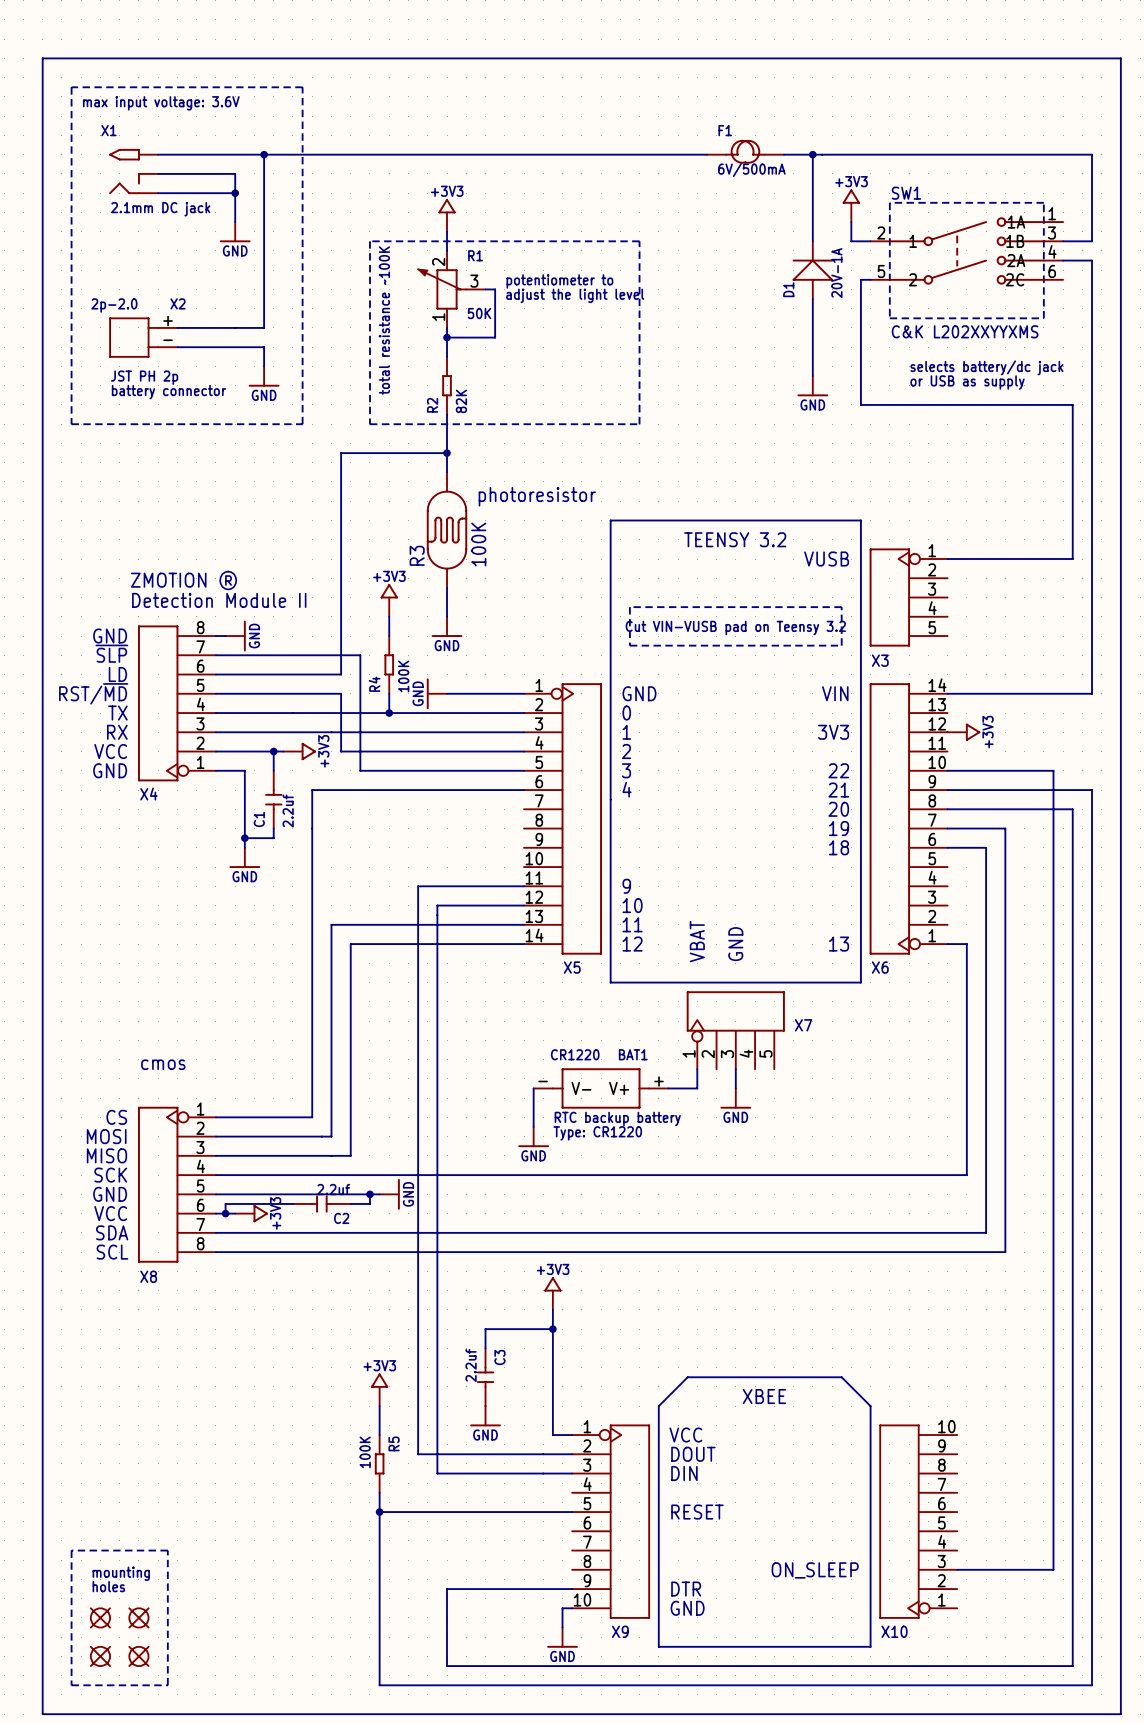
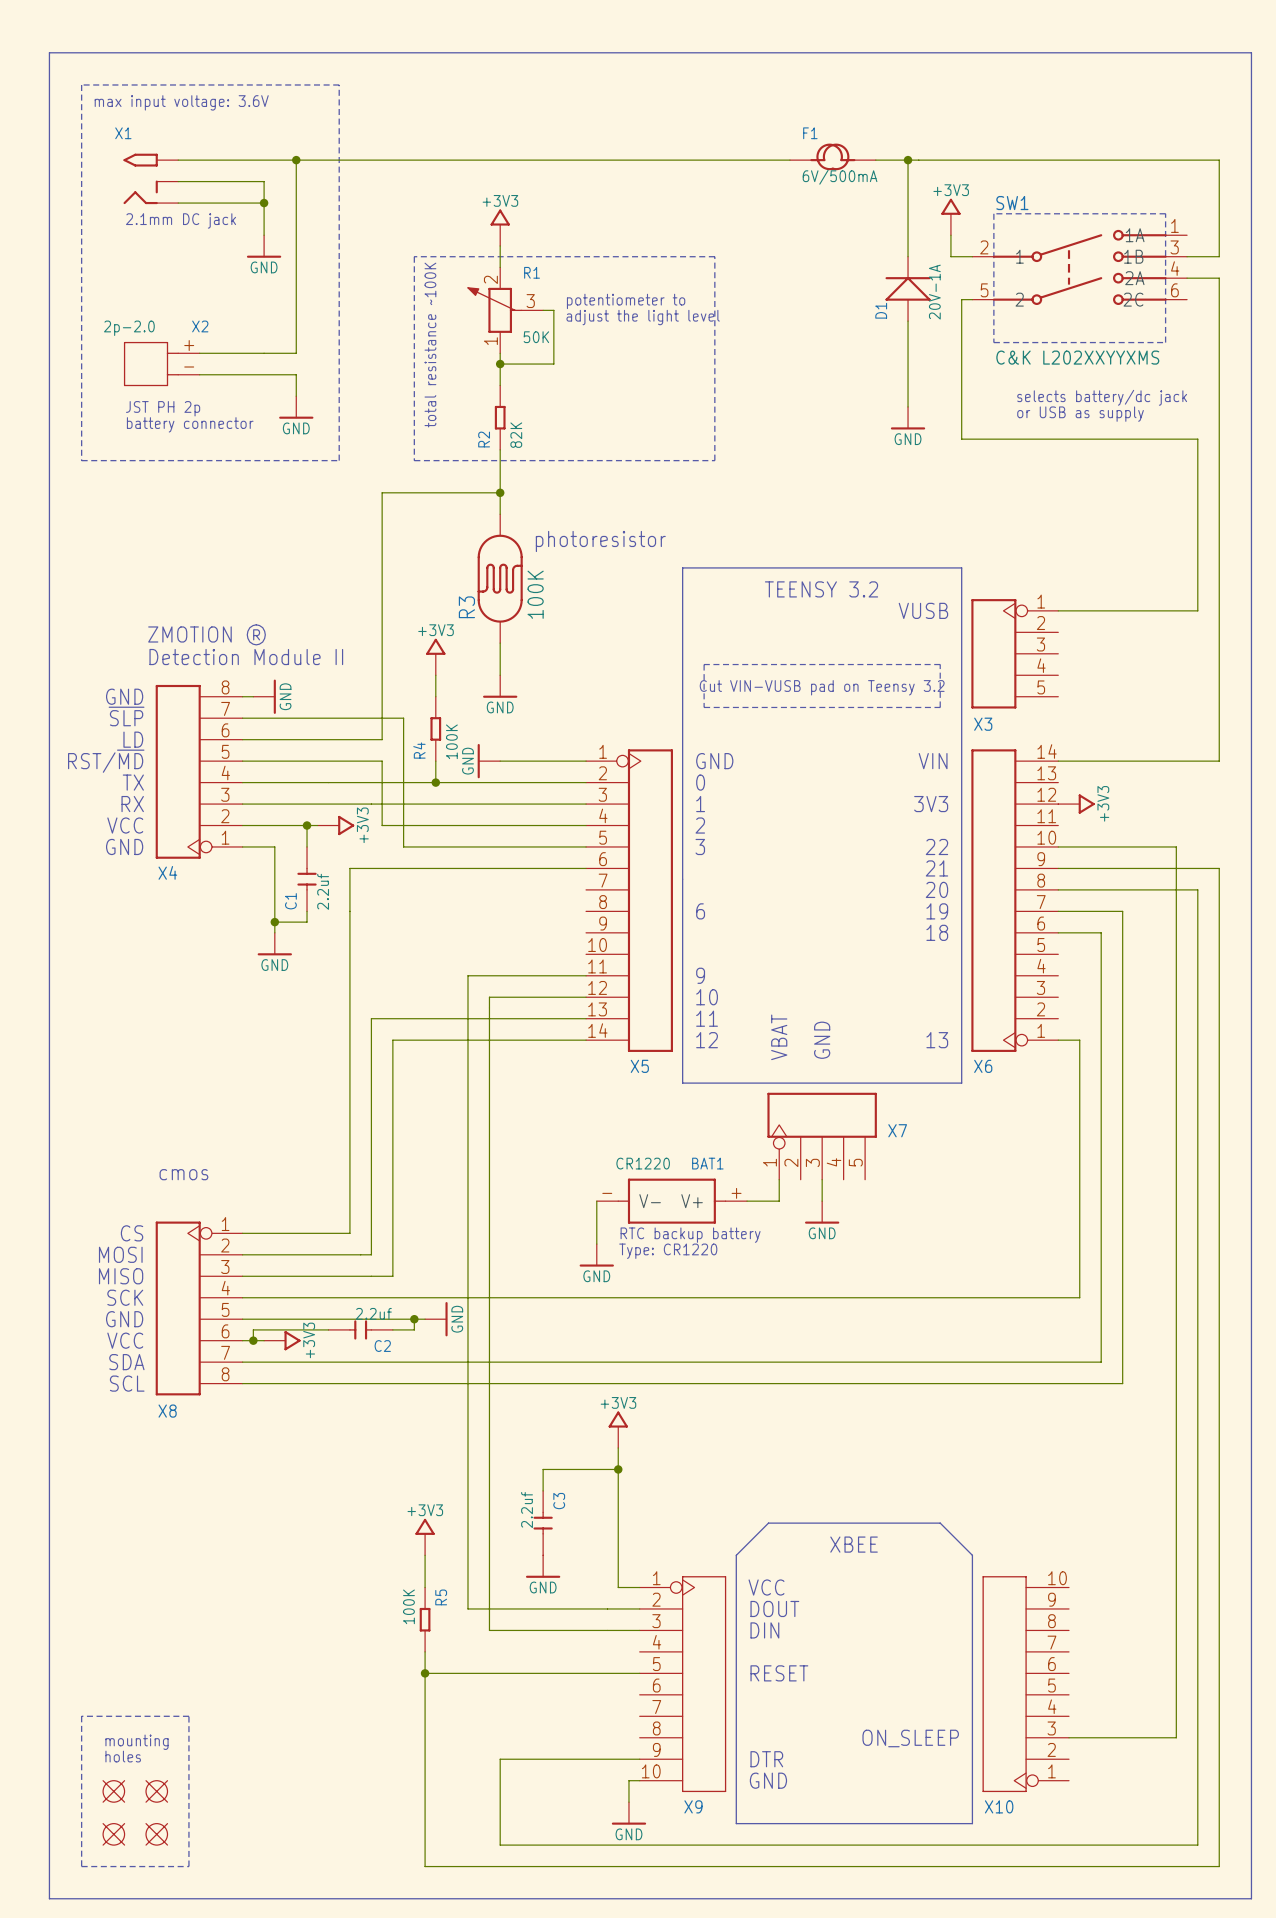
text: 4 (627, 789) -> none
text: none -> 6 (700, 911)

